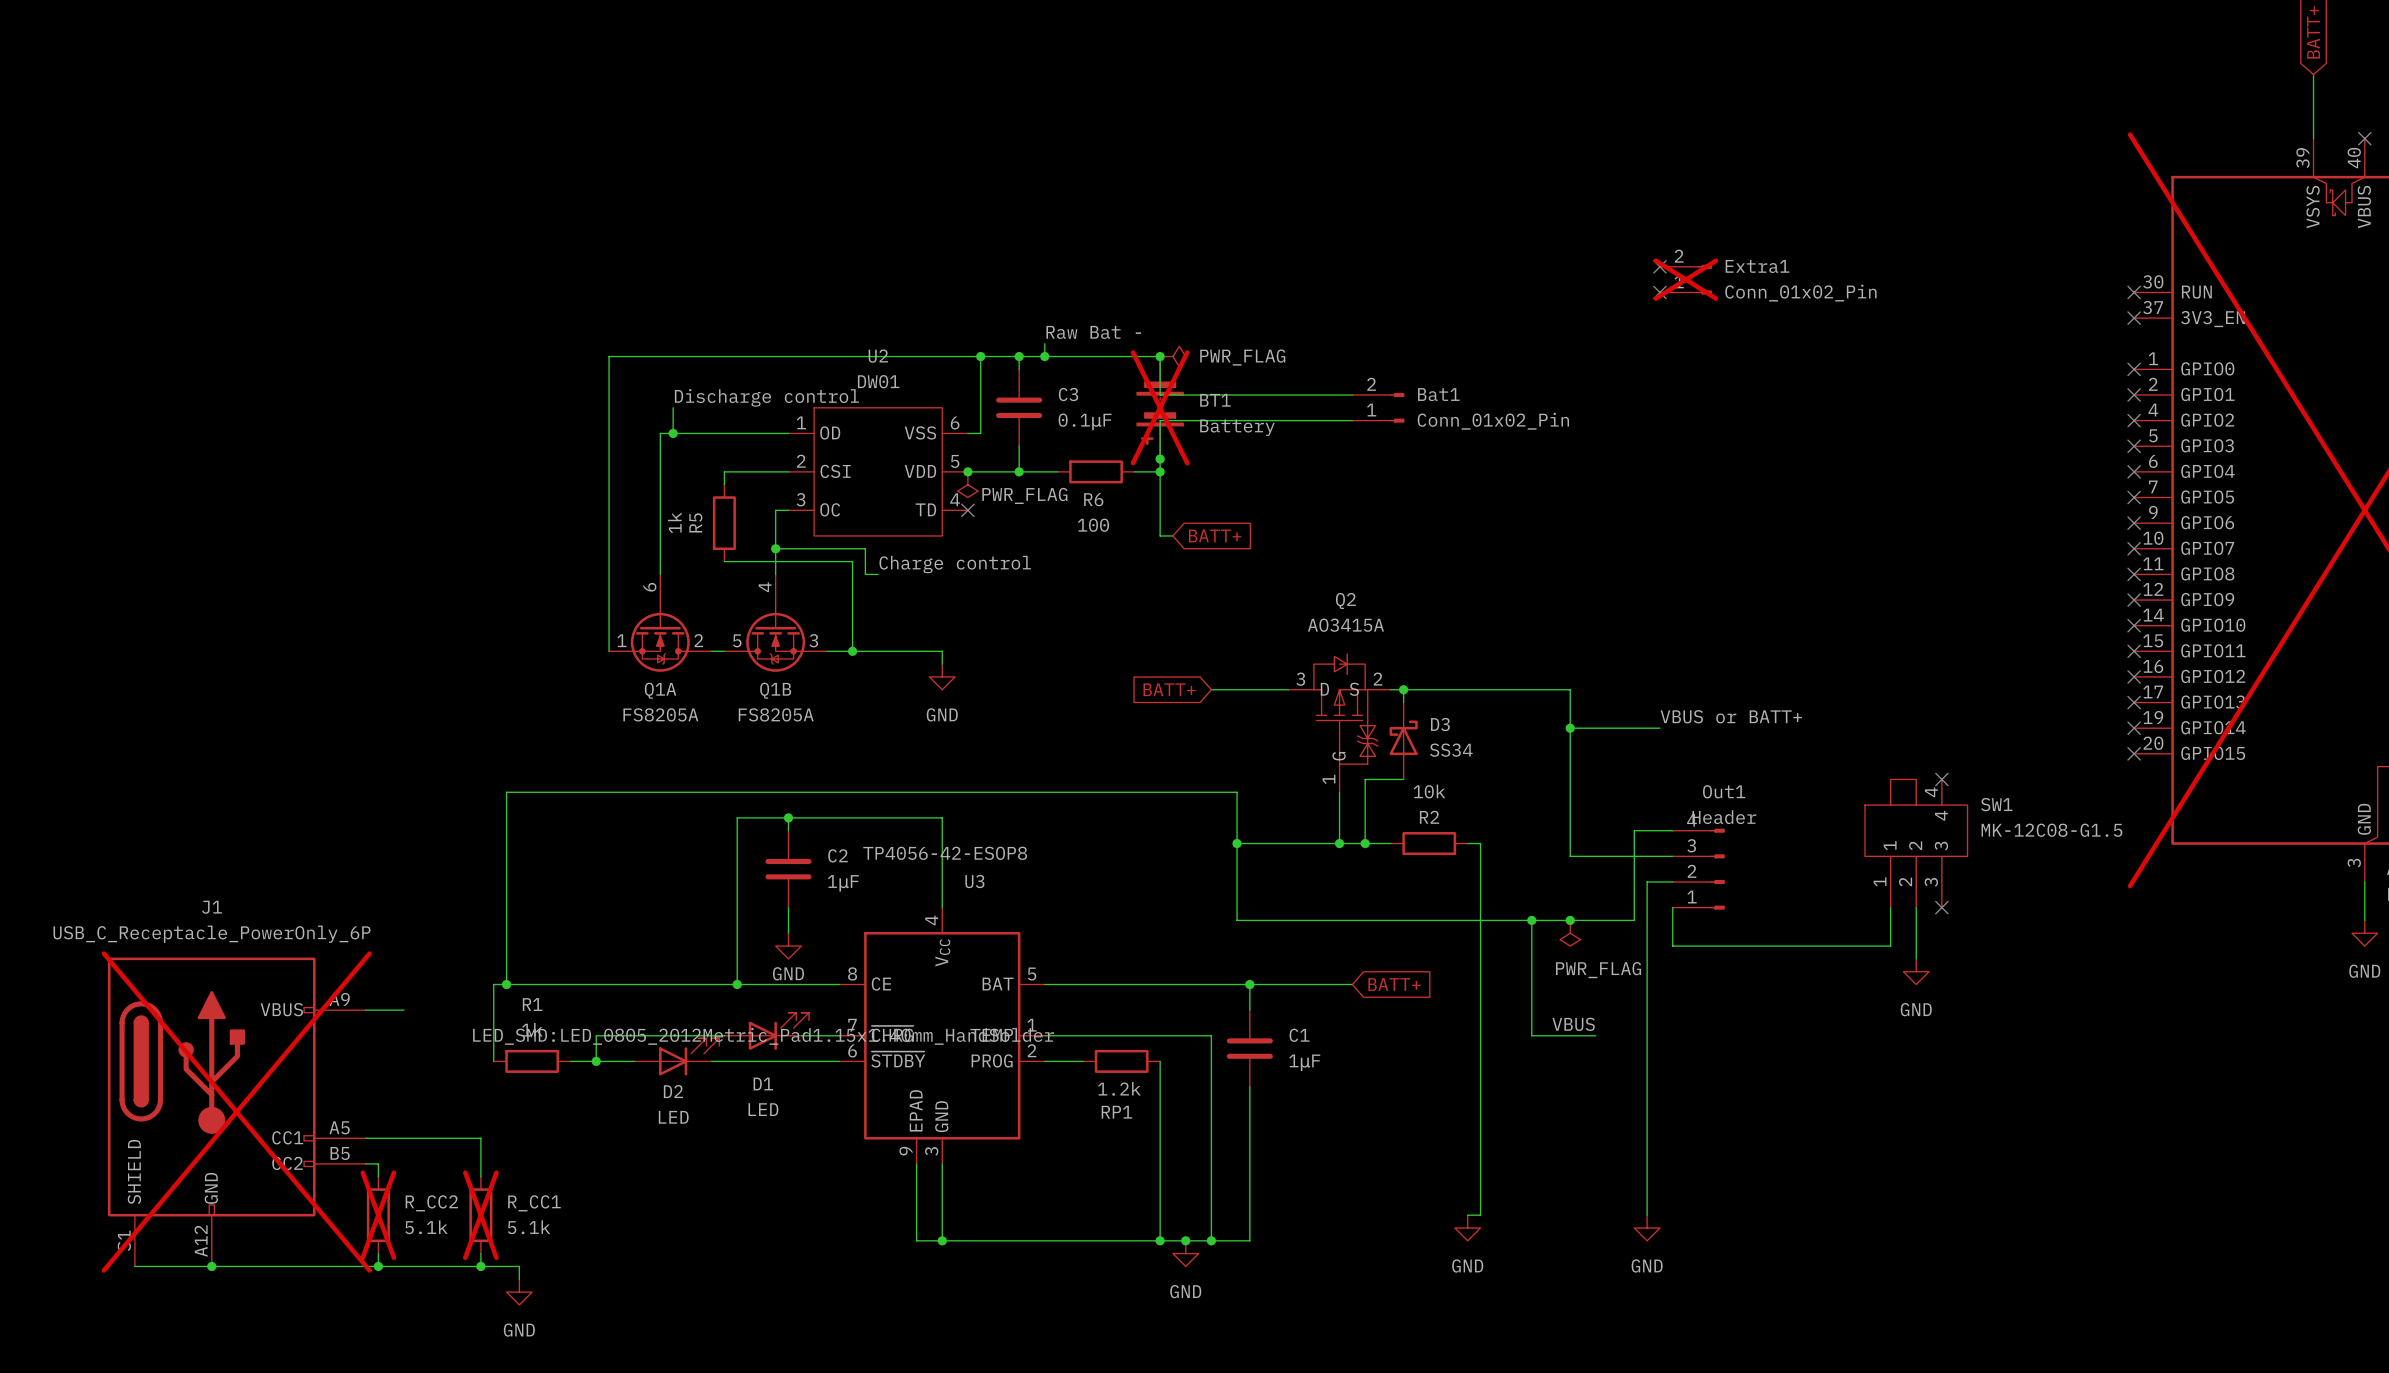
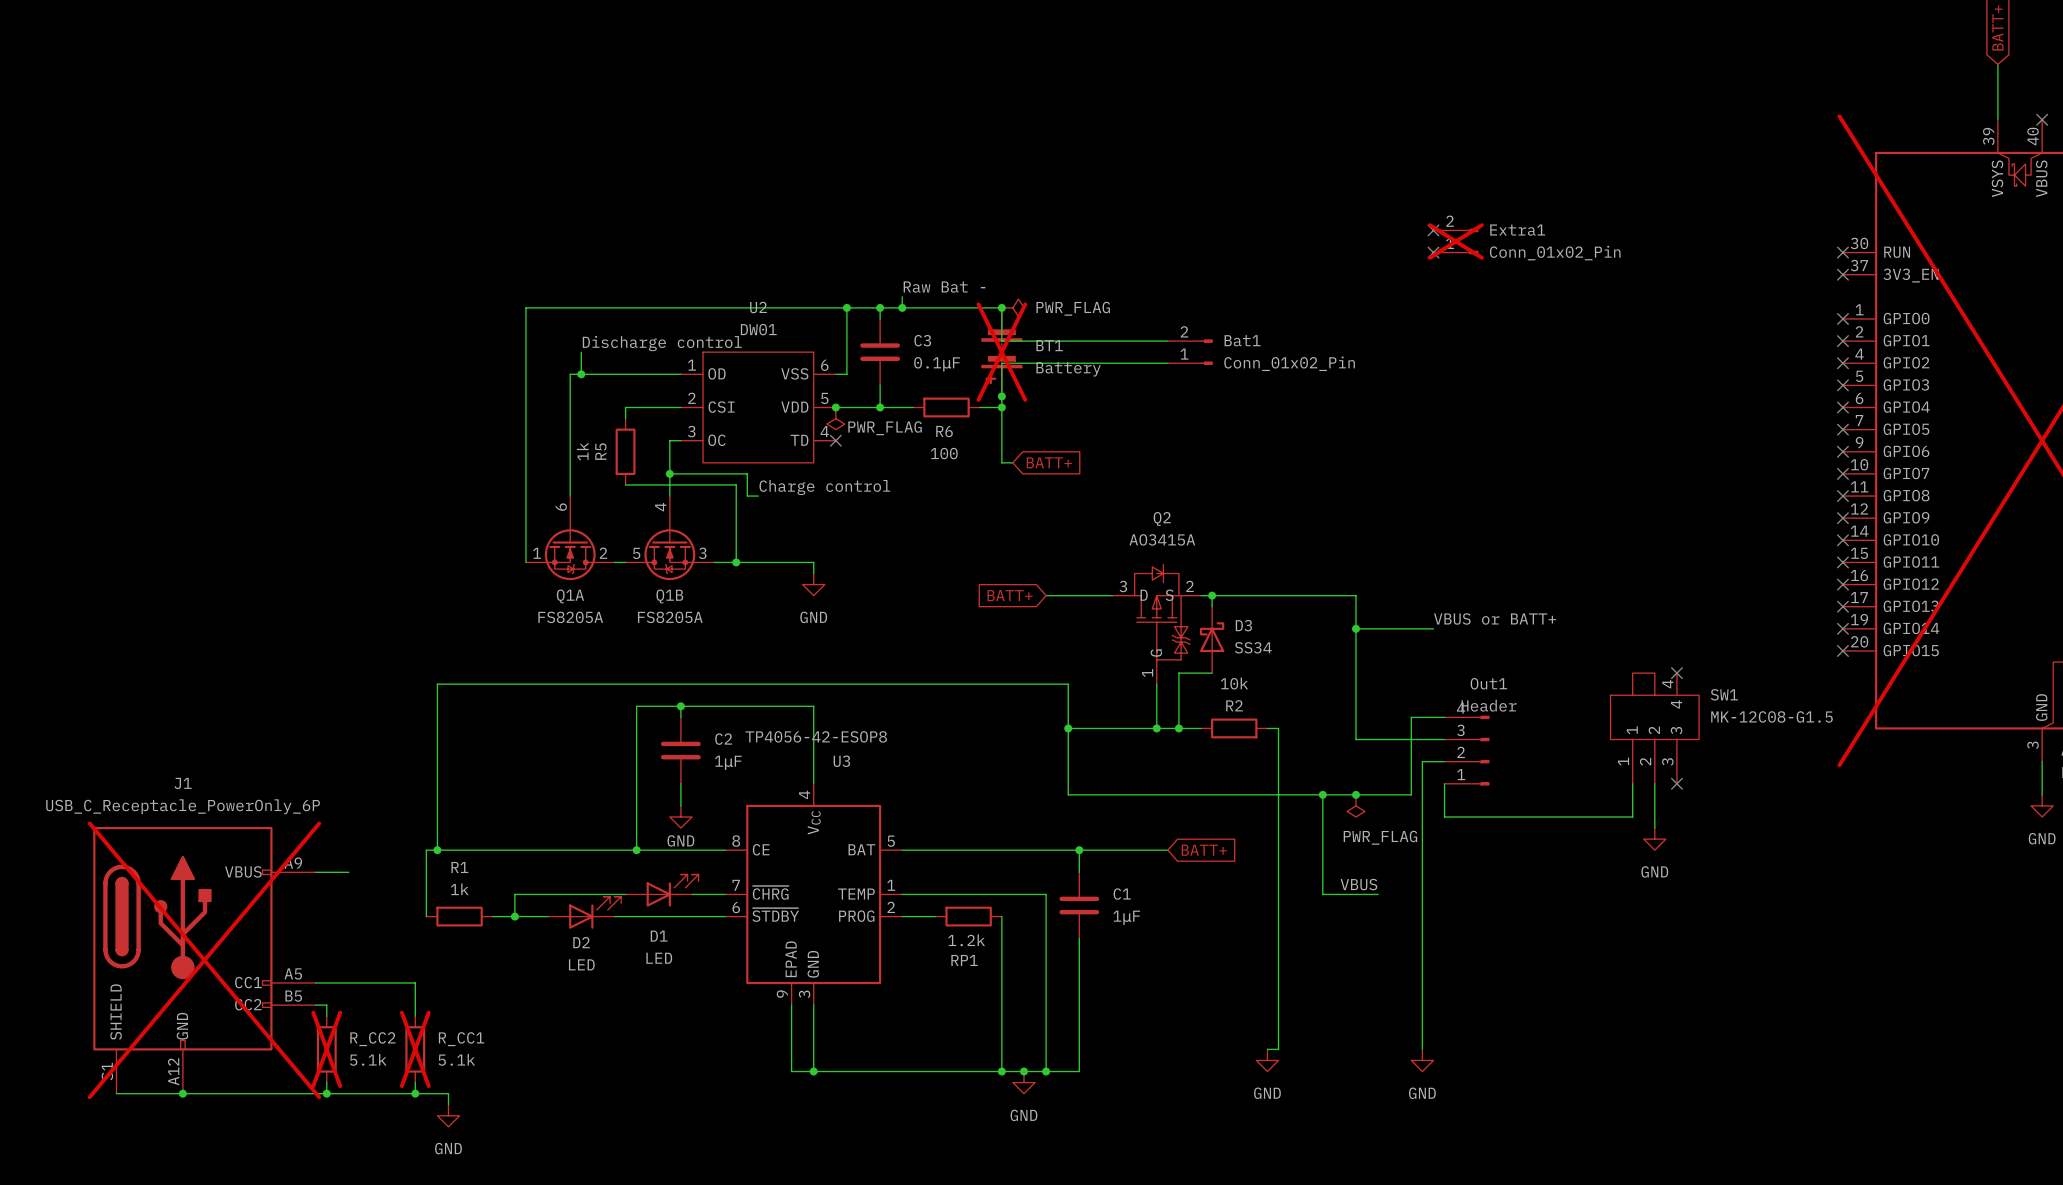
D1 text: LED_SMD:LED_0805_2012Metric_Pad1.15x1.40mm_HandSolder (763, 1036) -> none

